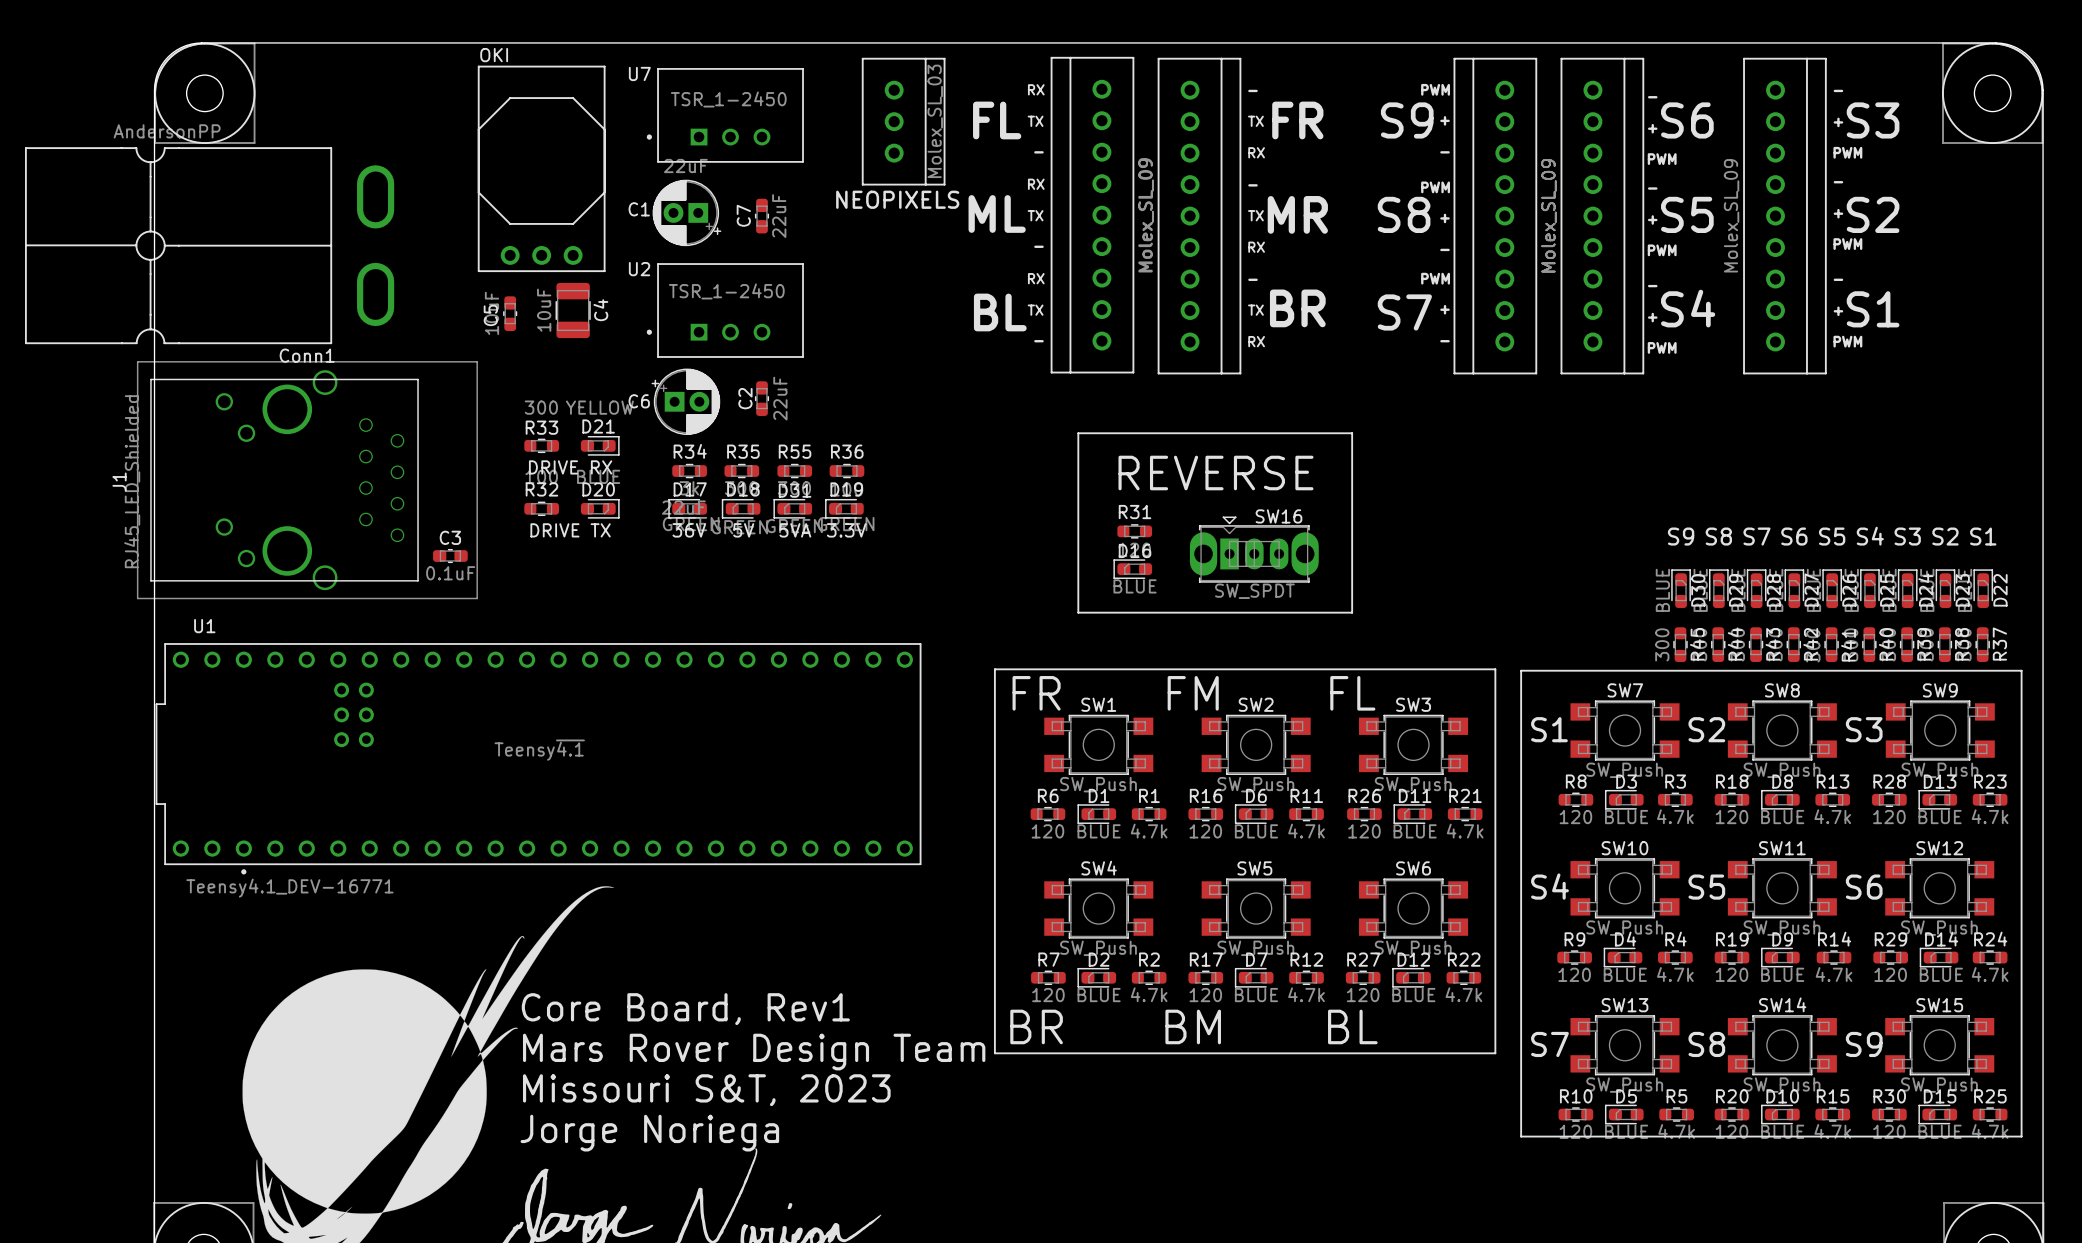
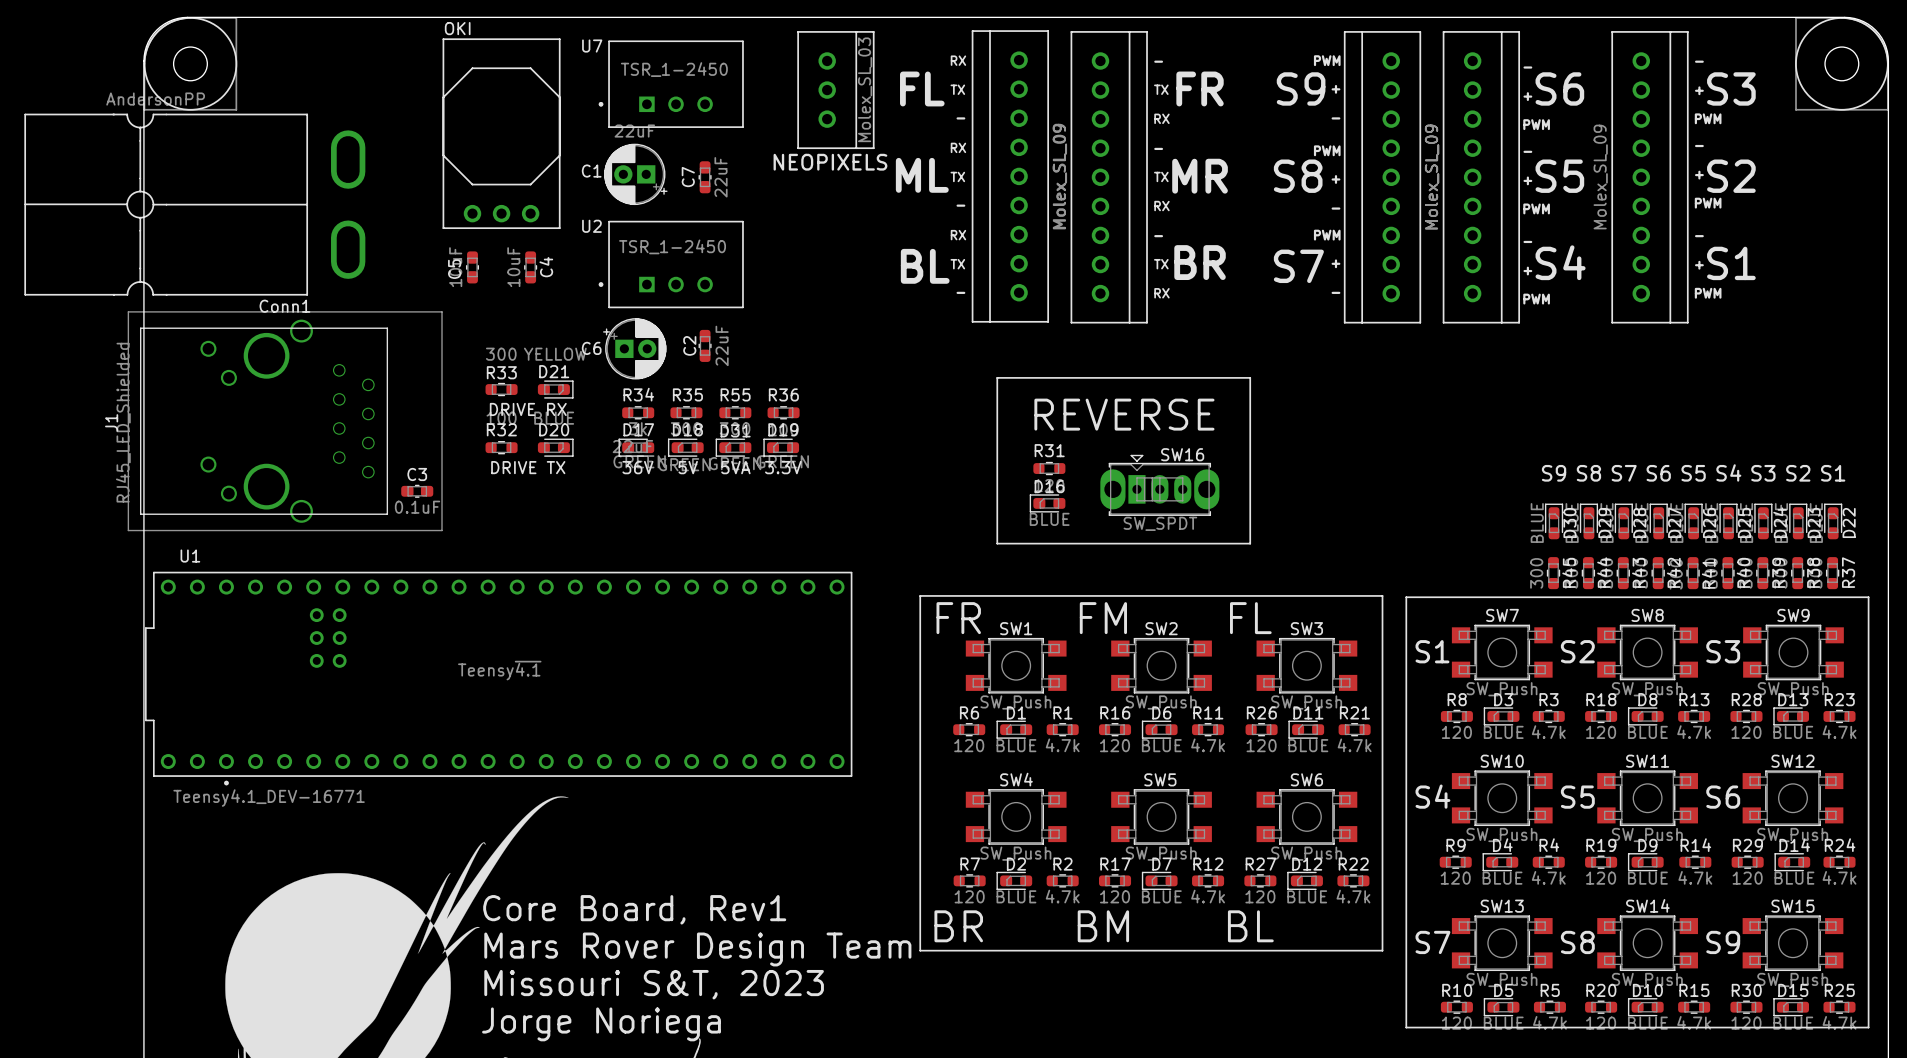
C4 footprint: [555, 282, 591, 339] -> [524, 251, 538, 284]

